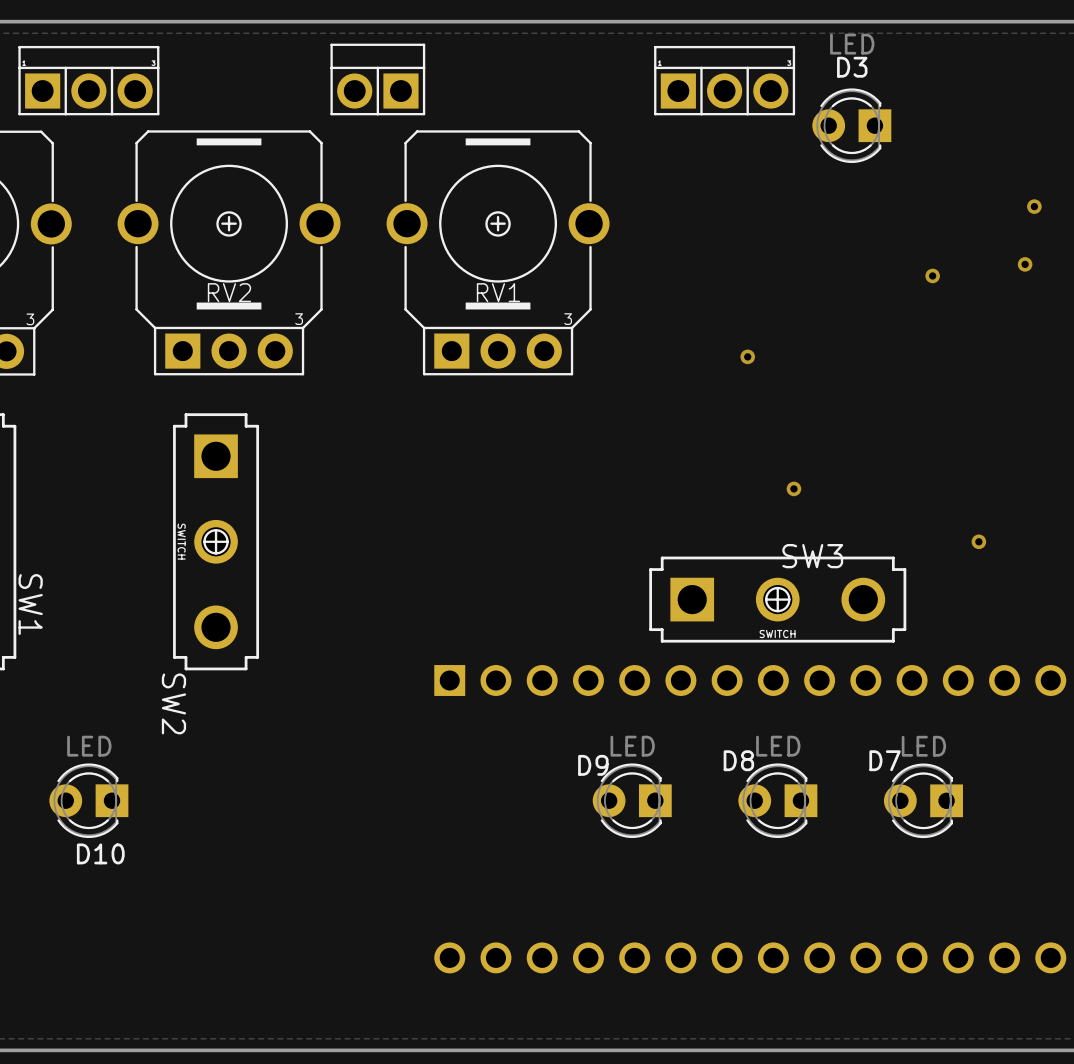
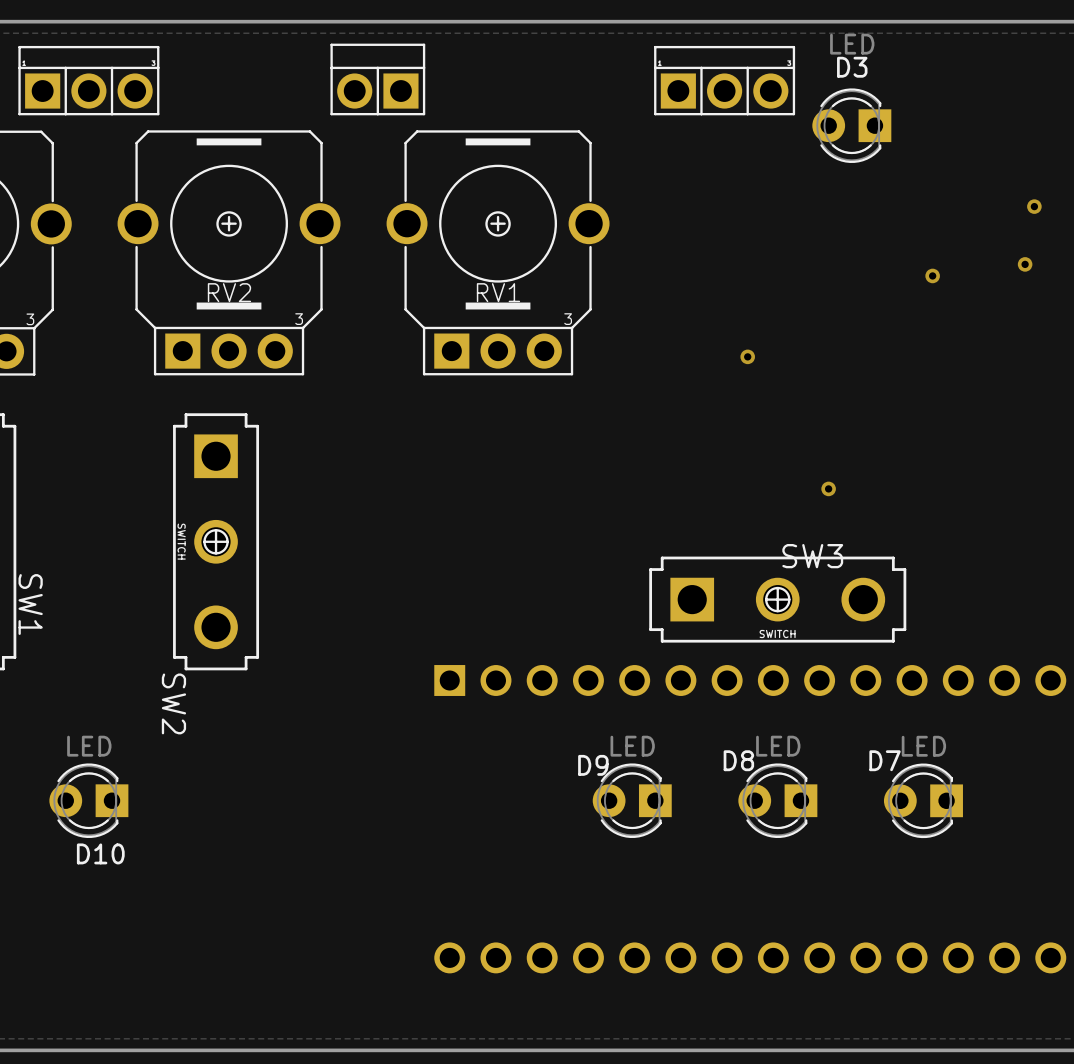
via position: (793, 488) -> (828, 488)
via: (978, 541) -> none

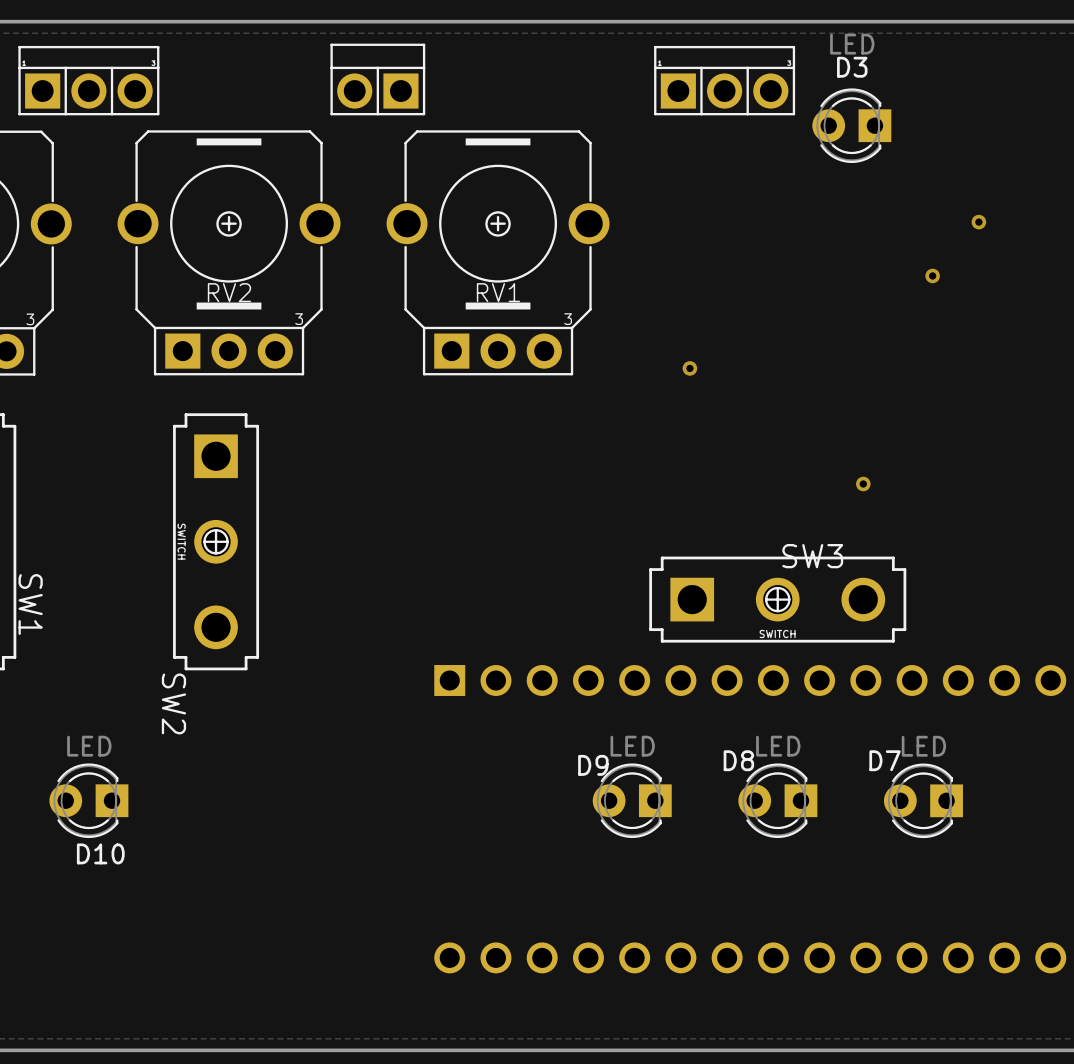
via: (1034, 206) -> none
via: none -> (978, 222)
via: (1025, 264) -> none
via position: (747, 356) -> (689, 368)
via position: (828, 488) -> (863, 484)

